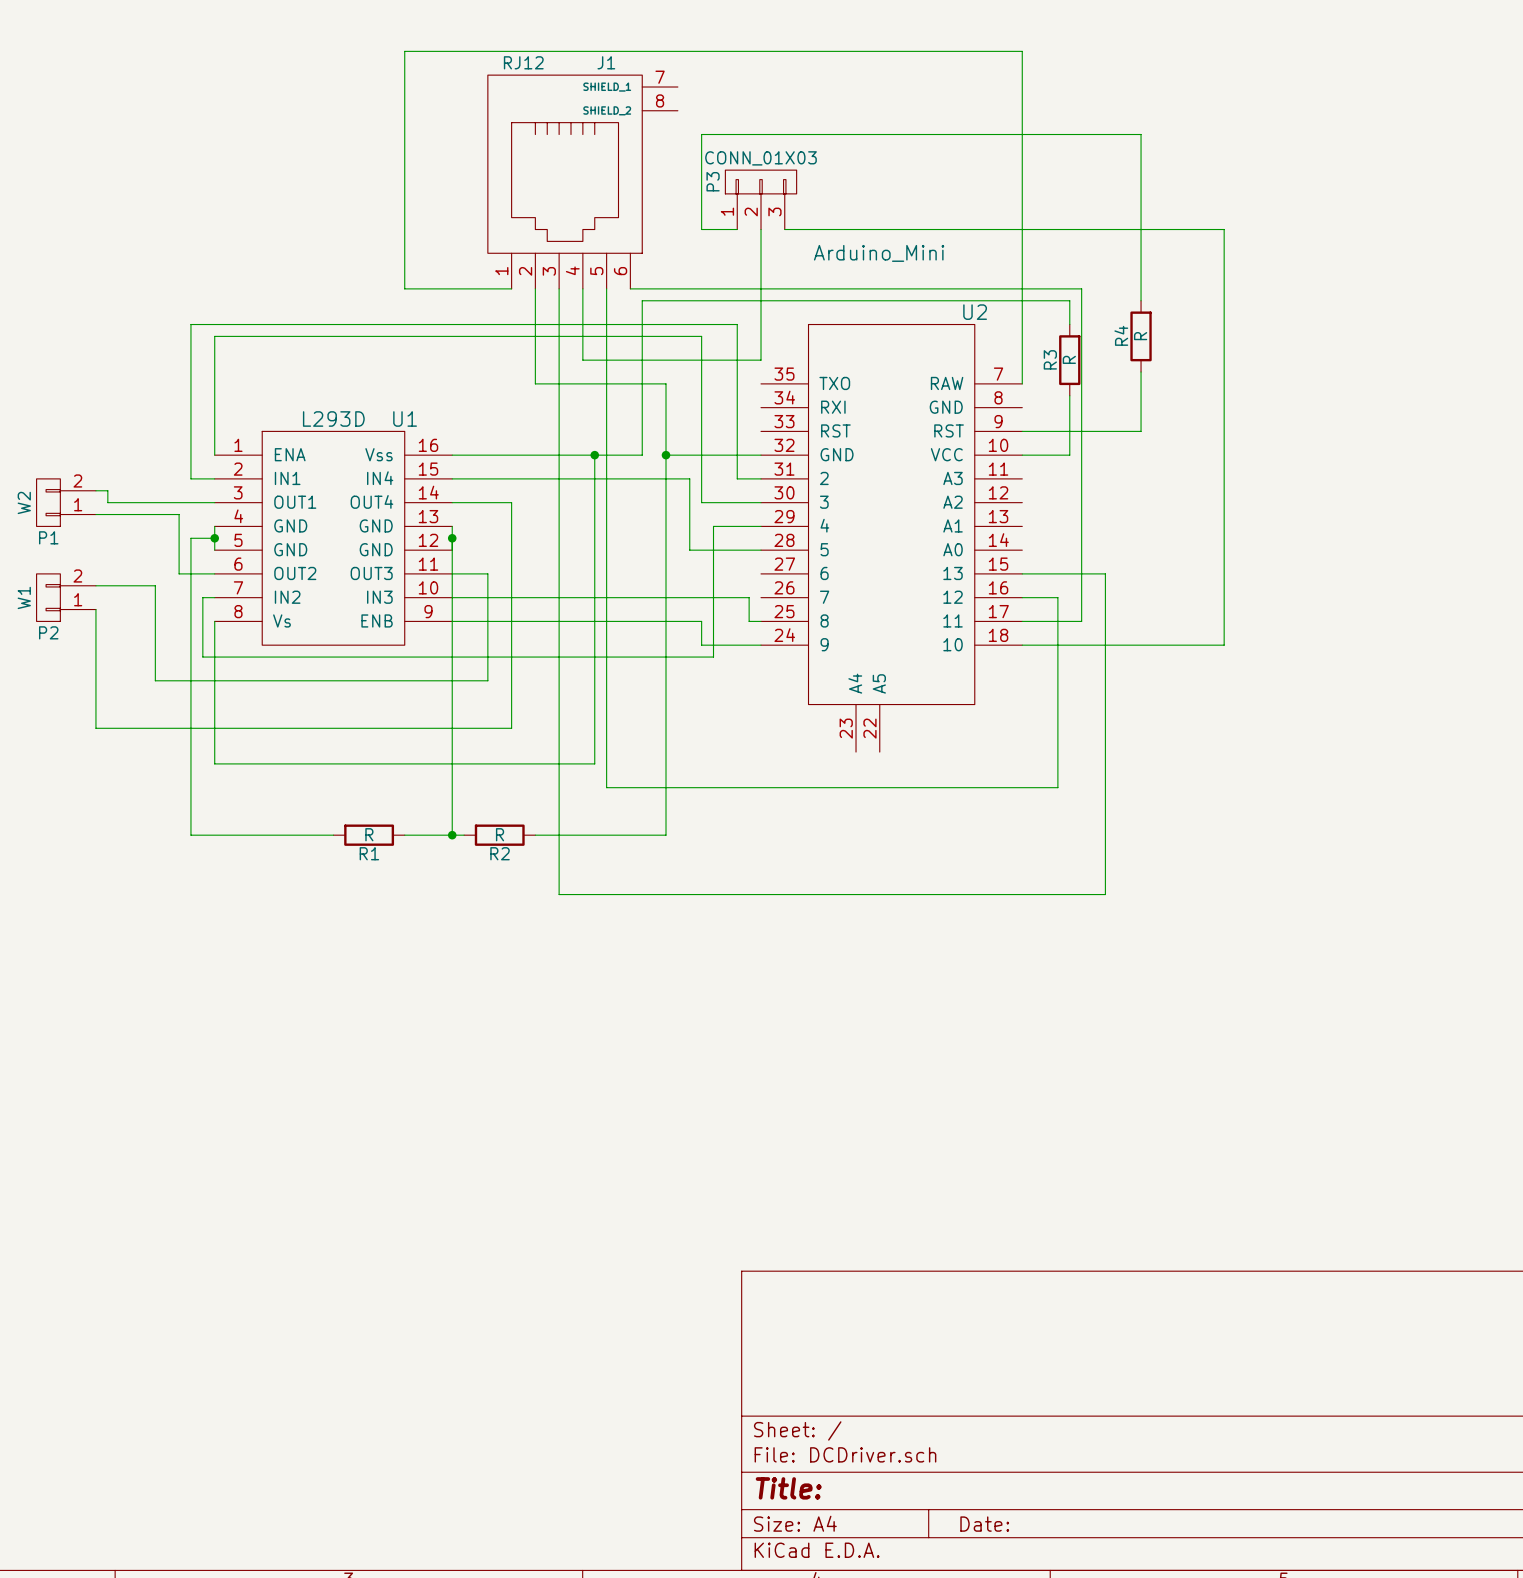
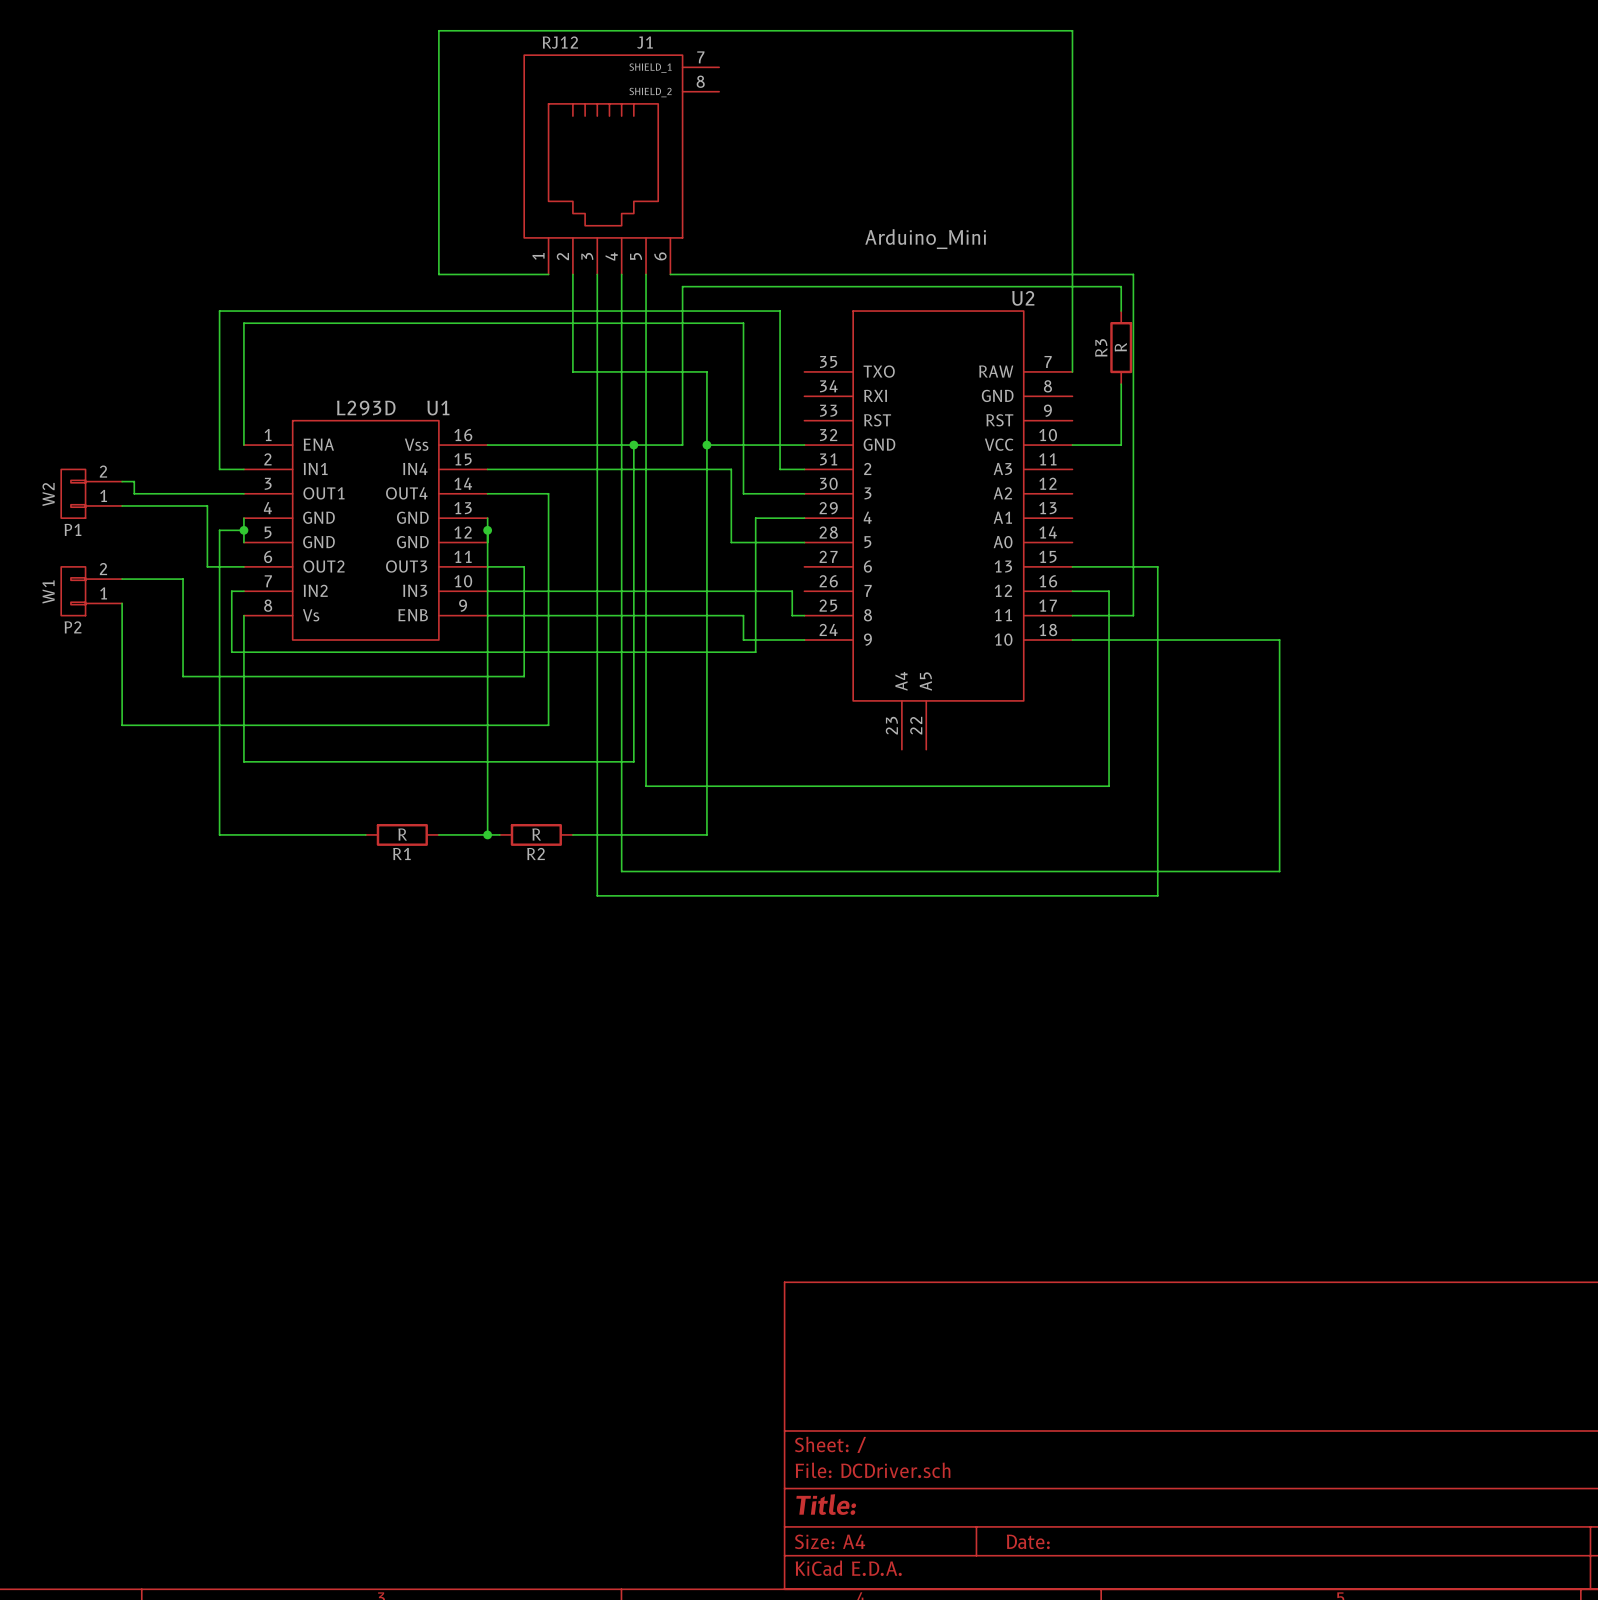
P3: CONN_01X03 (761, 199) -> none
wire: (737, 229) (701, 229) (701, 134) (1141, 134) (1141, 300) -> none
wire: (761, 229) (761, 360) (582, 360) -> none
wire: (784, 229) (1224, 229) (1224, 645) -> (621, 347) (621, 871) (1279, 871) (1279, 640)
R4: R (1141, 336) -> none
wire: (1141, 372) (1141, 431) (1022, 431) -> none

